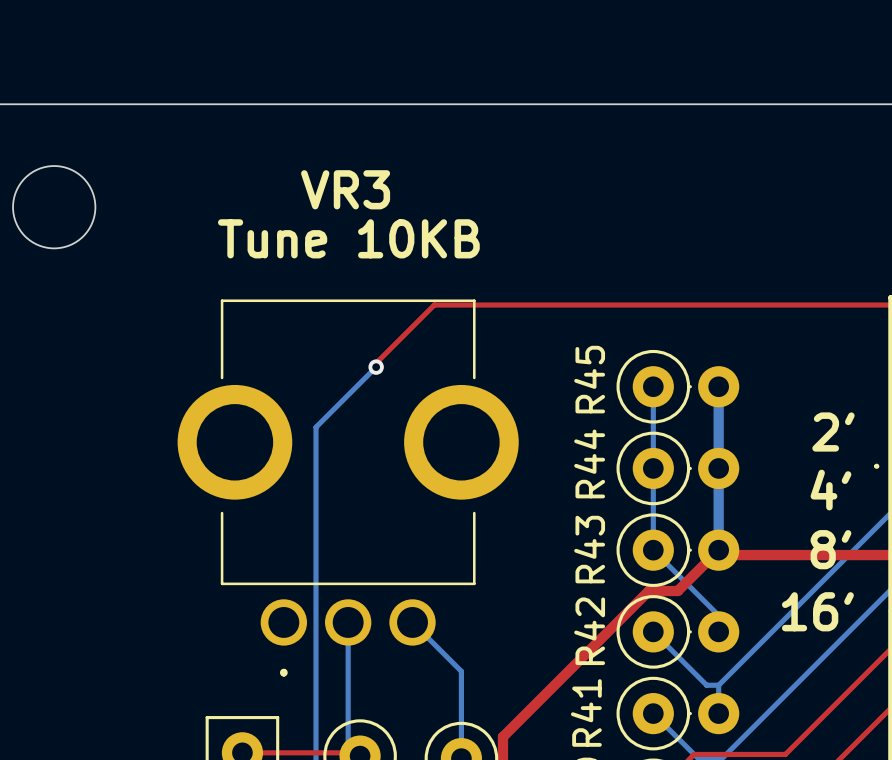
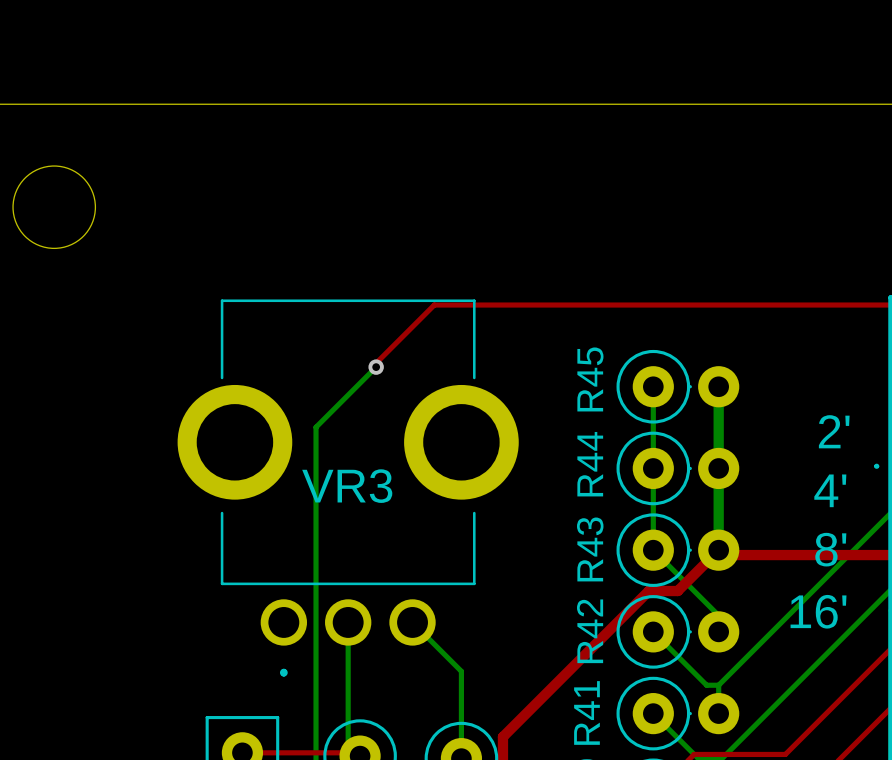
VR3 name position: VR3 (345, 189) -> VR3 (347, 486)
VR3 value: Tune 10KB (348, 238) -> none

